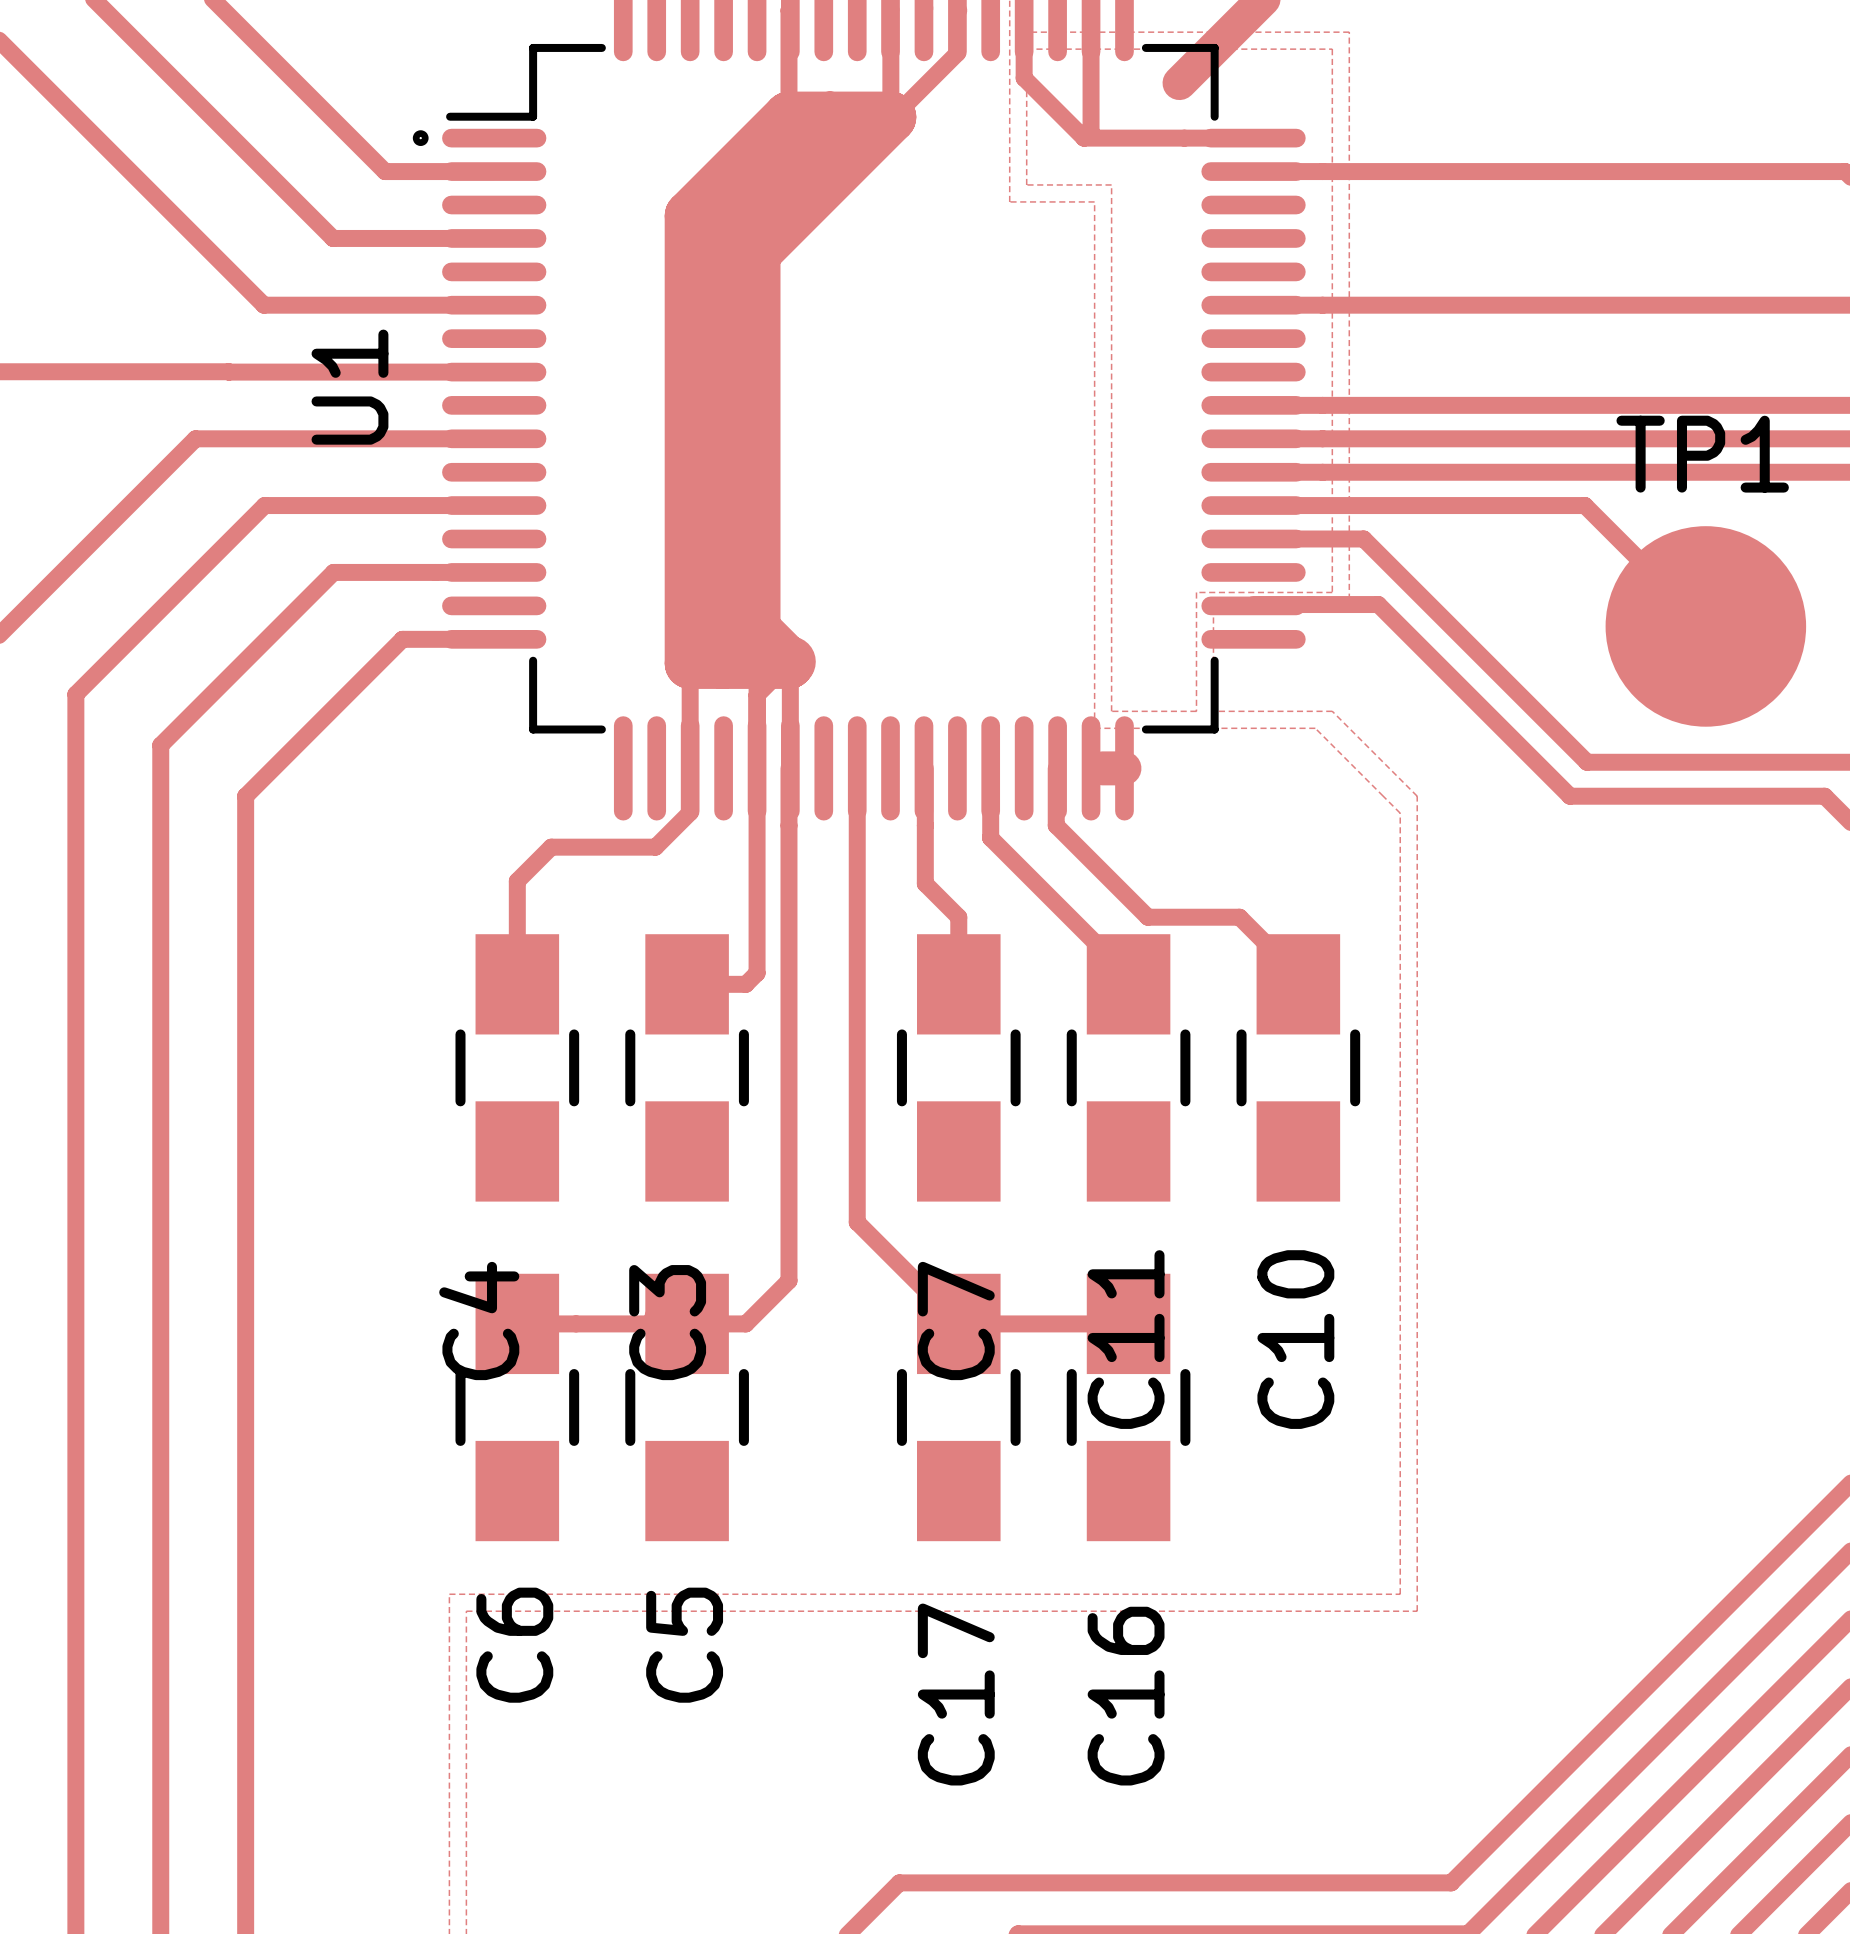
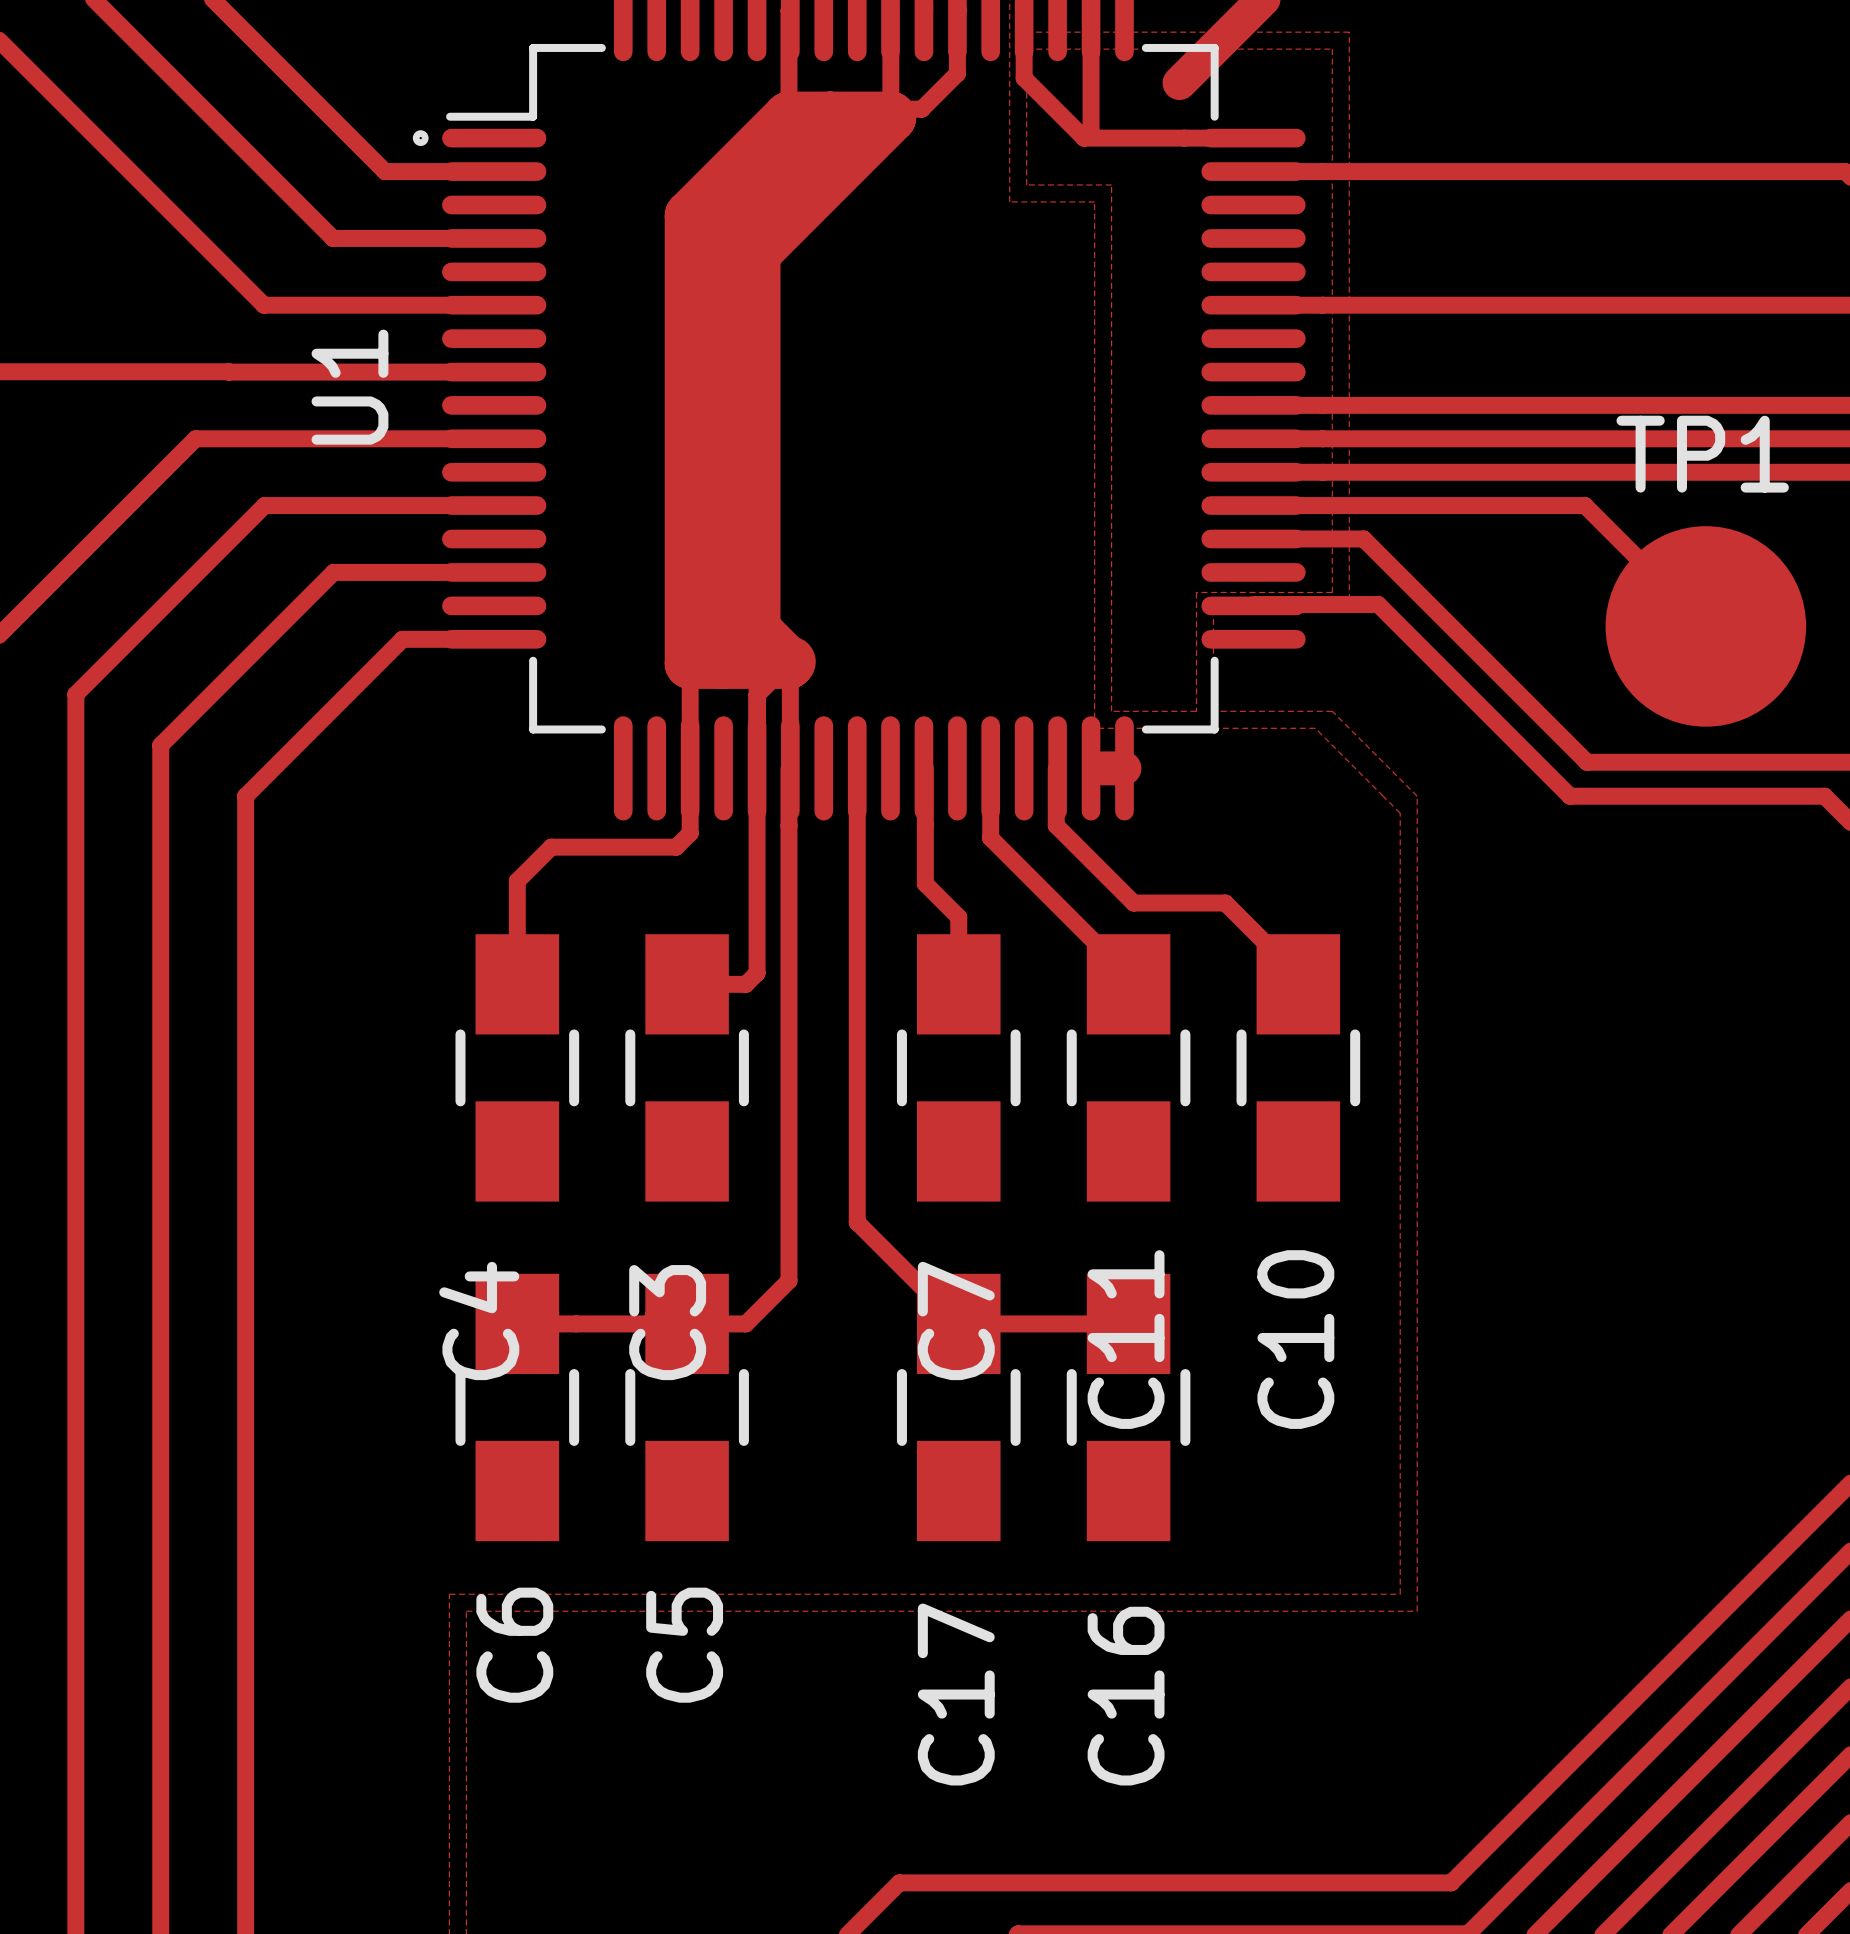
track: (957, 53) (901, 109) -> (957, 53) (957, 73) (921, 109) (901, 109)
track: (690, 812) (655, 847) -> (690, 812) (690, 833) (676, 847) (655, 847)
track: (1133, 903) (1147, 917) (1239, 917) -> (1133, 903) (1225, 903) (1239, 917)

